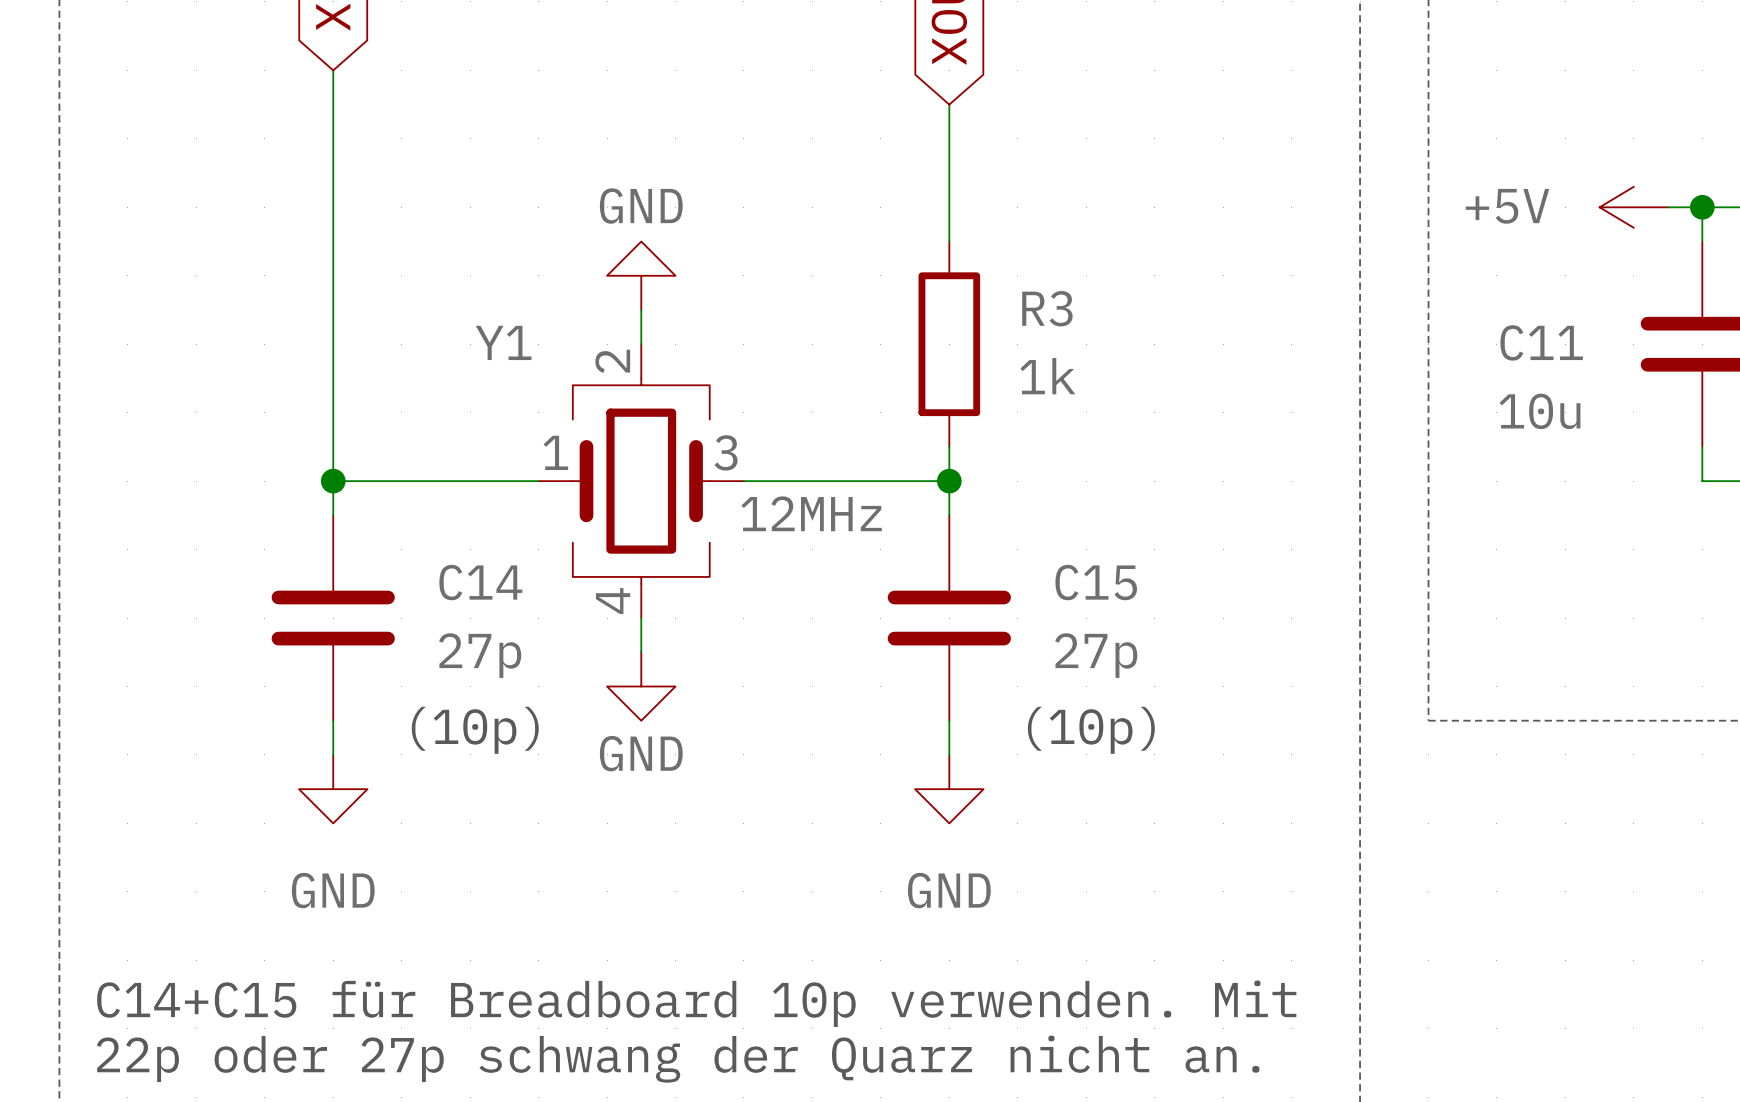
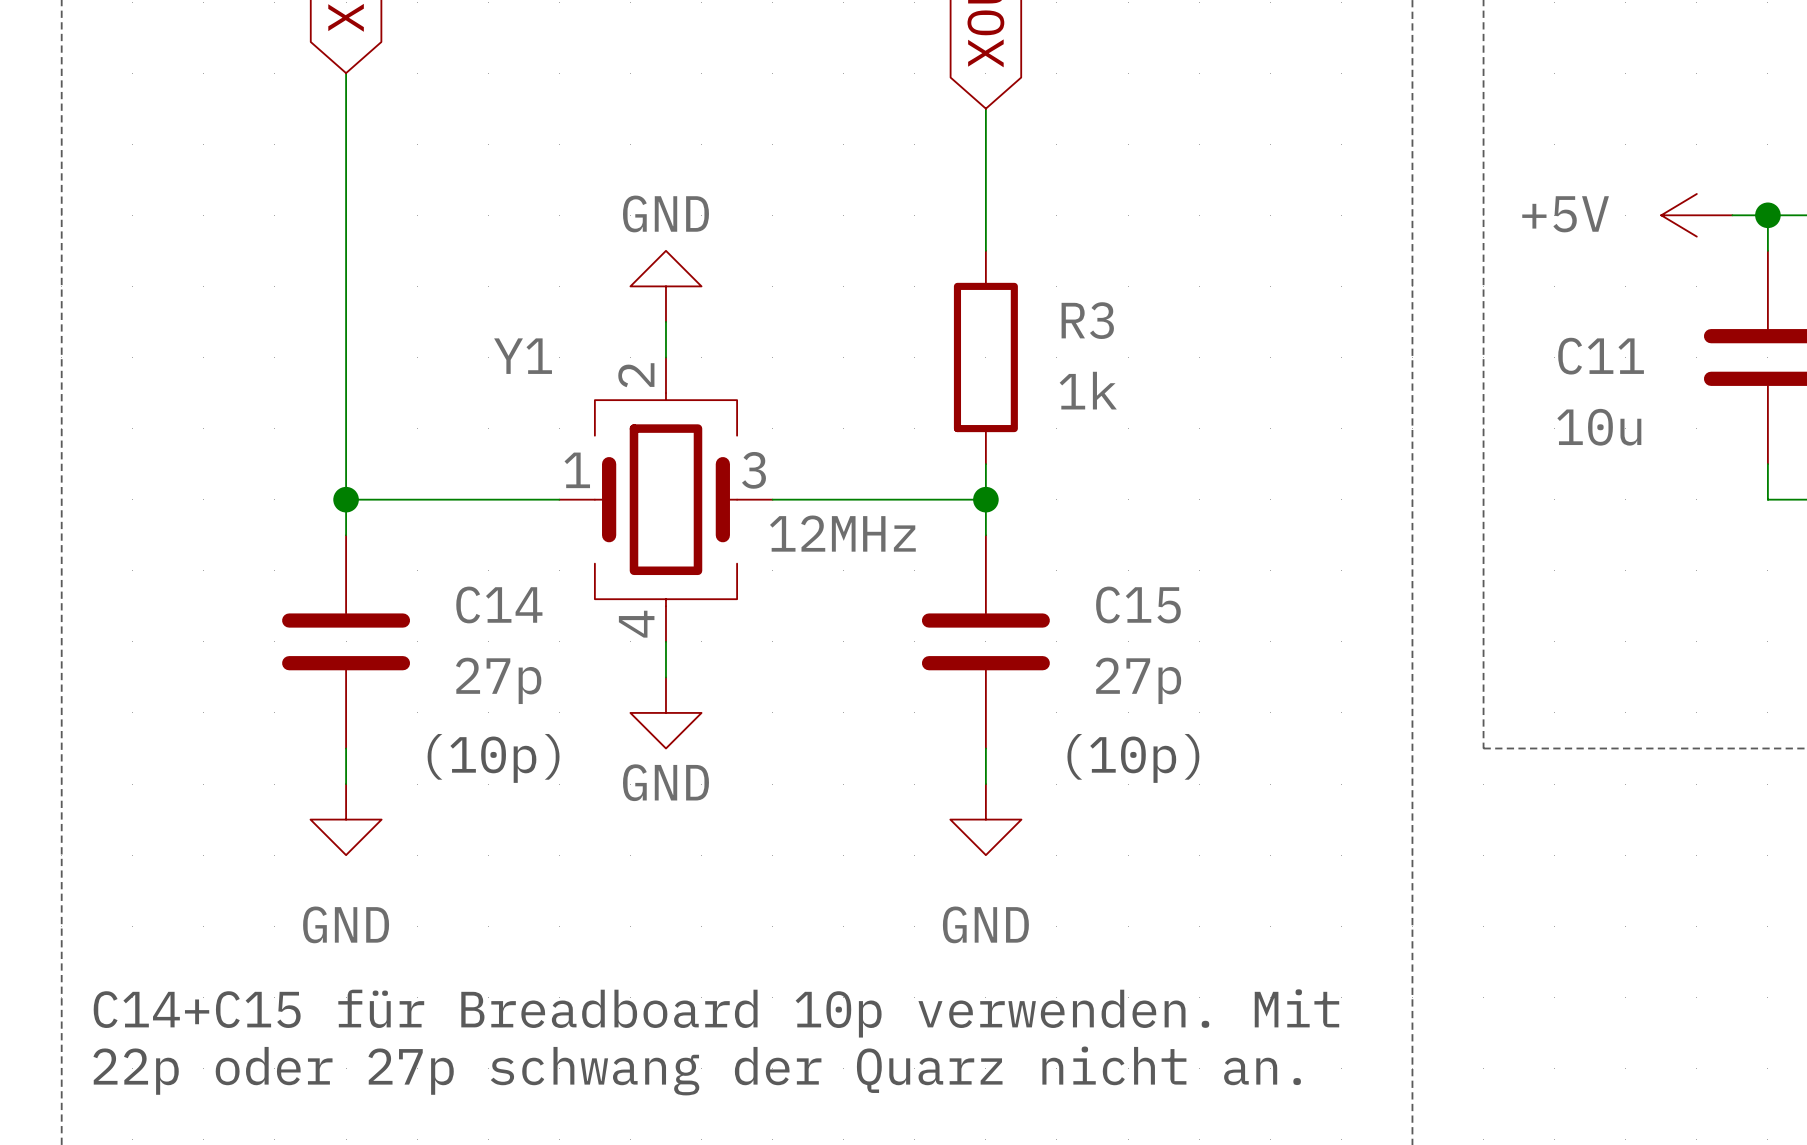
text position: C14+C15 für Breadboard 10p verwenden. Mit (696, 1003) -> C14+C15 für Breadboard 10p verwenden. Mit (716, 1013)
text position: 22p oder 27p schwang der Quarz nicht an. (678, 1059) -> 22p oder 27p schwang der Quarz nicht an. (697, 1070)

